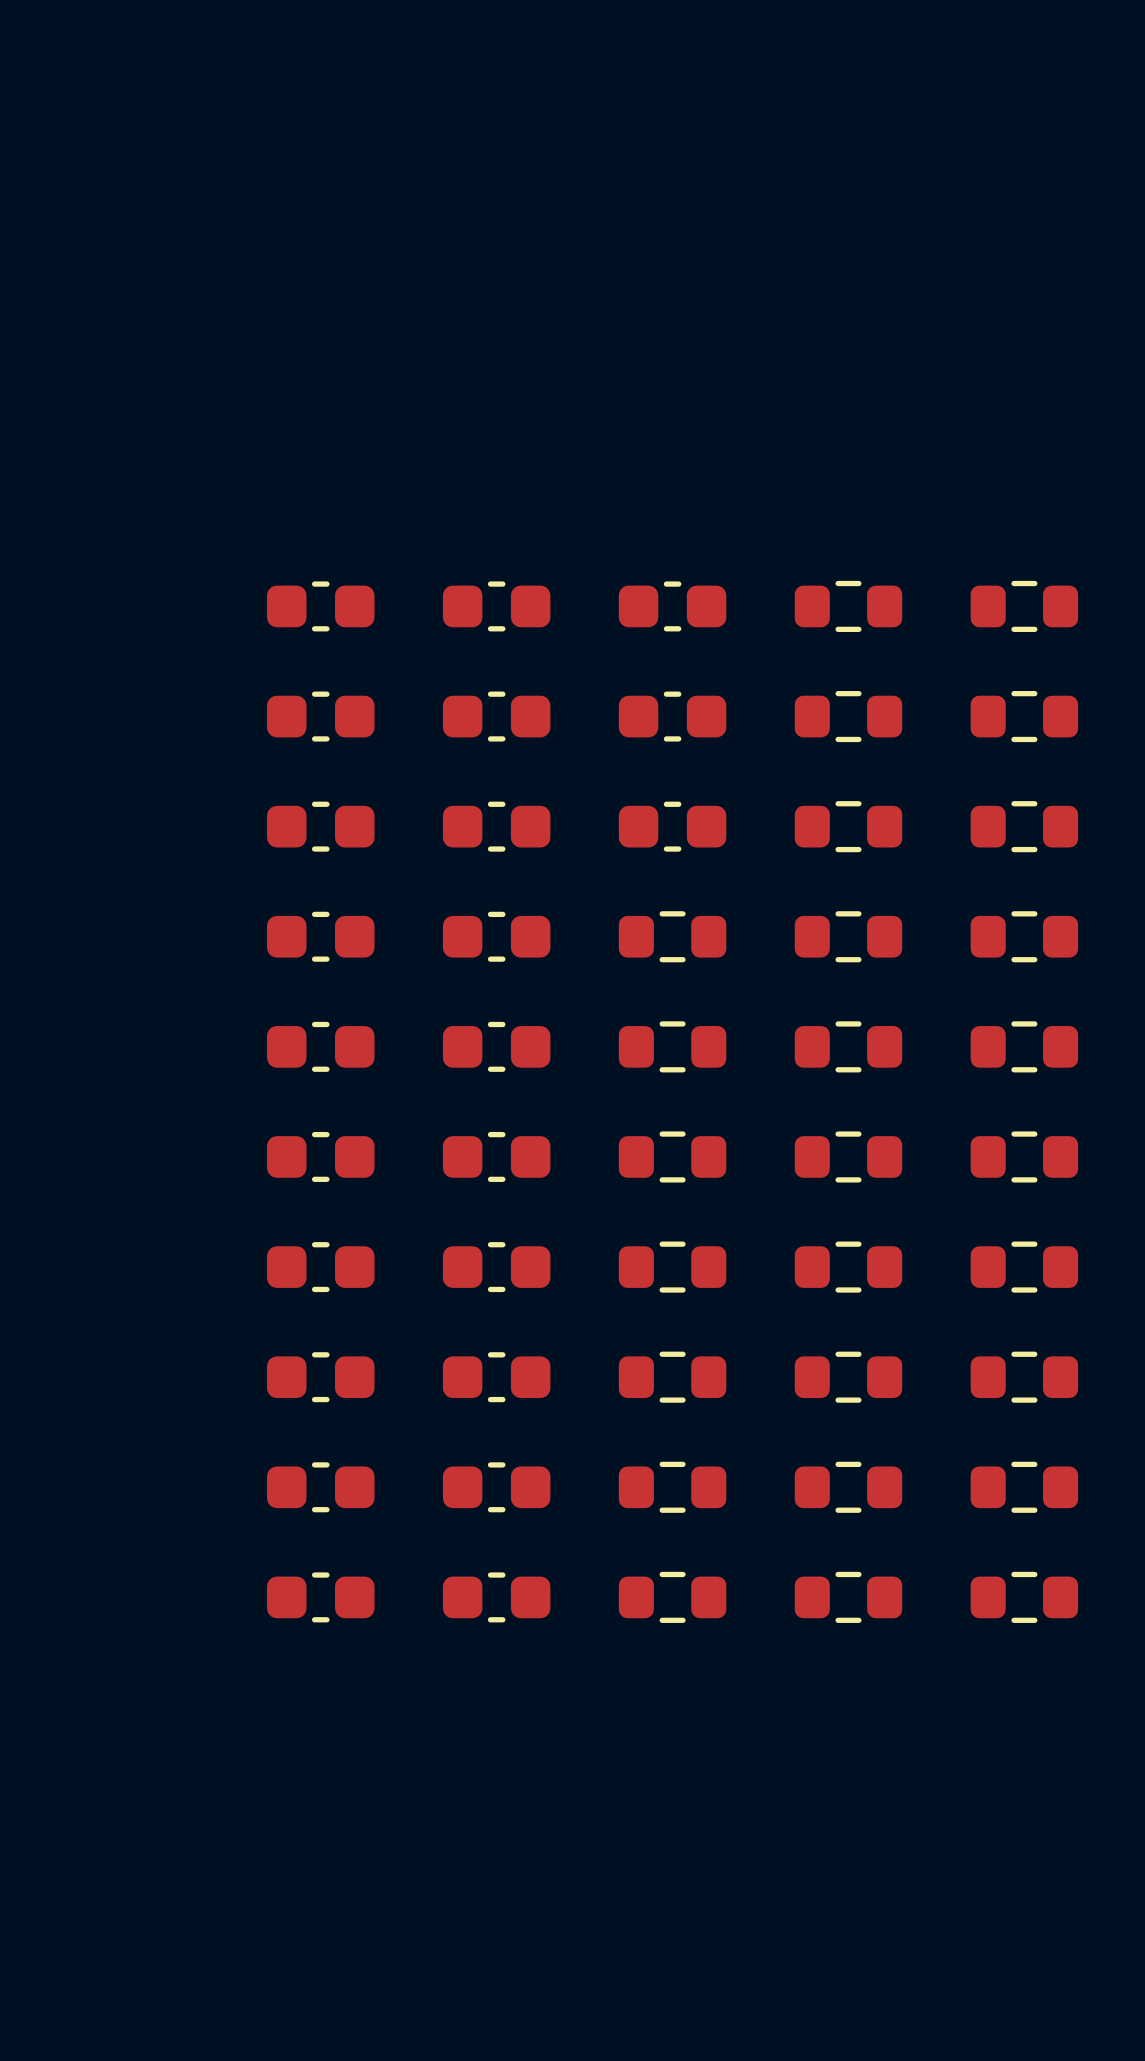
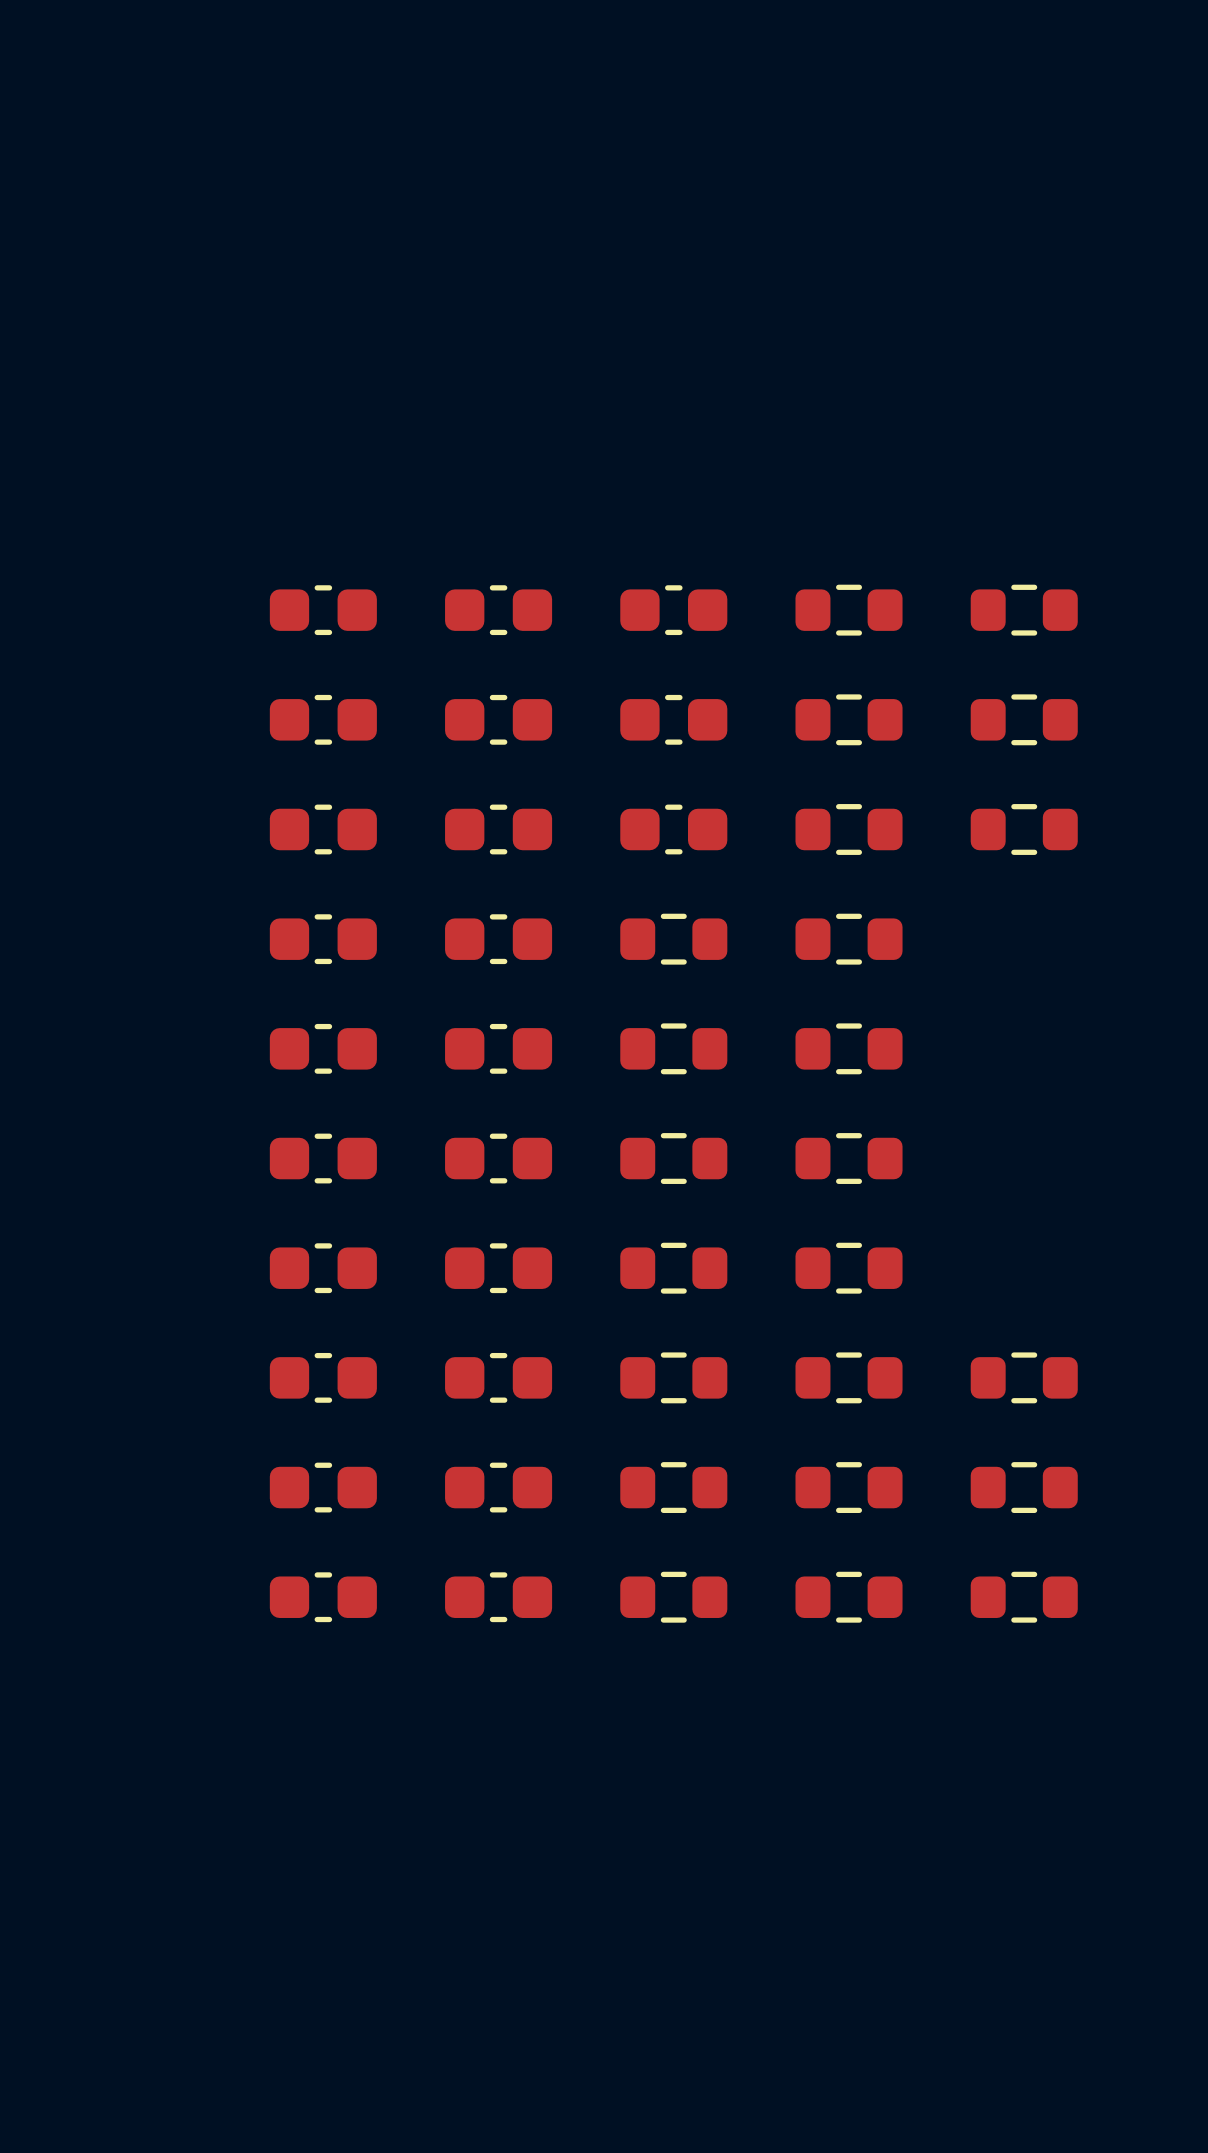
part: (1024, 936) -> none
part: (1024, 1046) -> none
part: (1024, 1156) -> none
part: (1024, 1267) -> none

